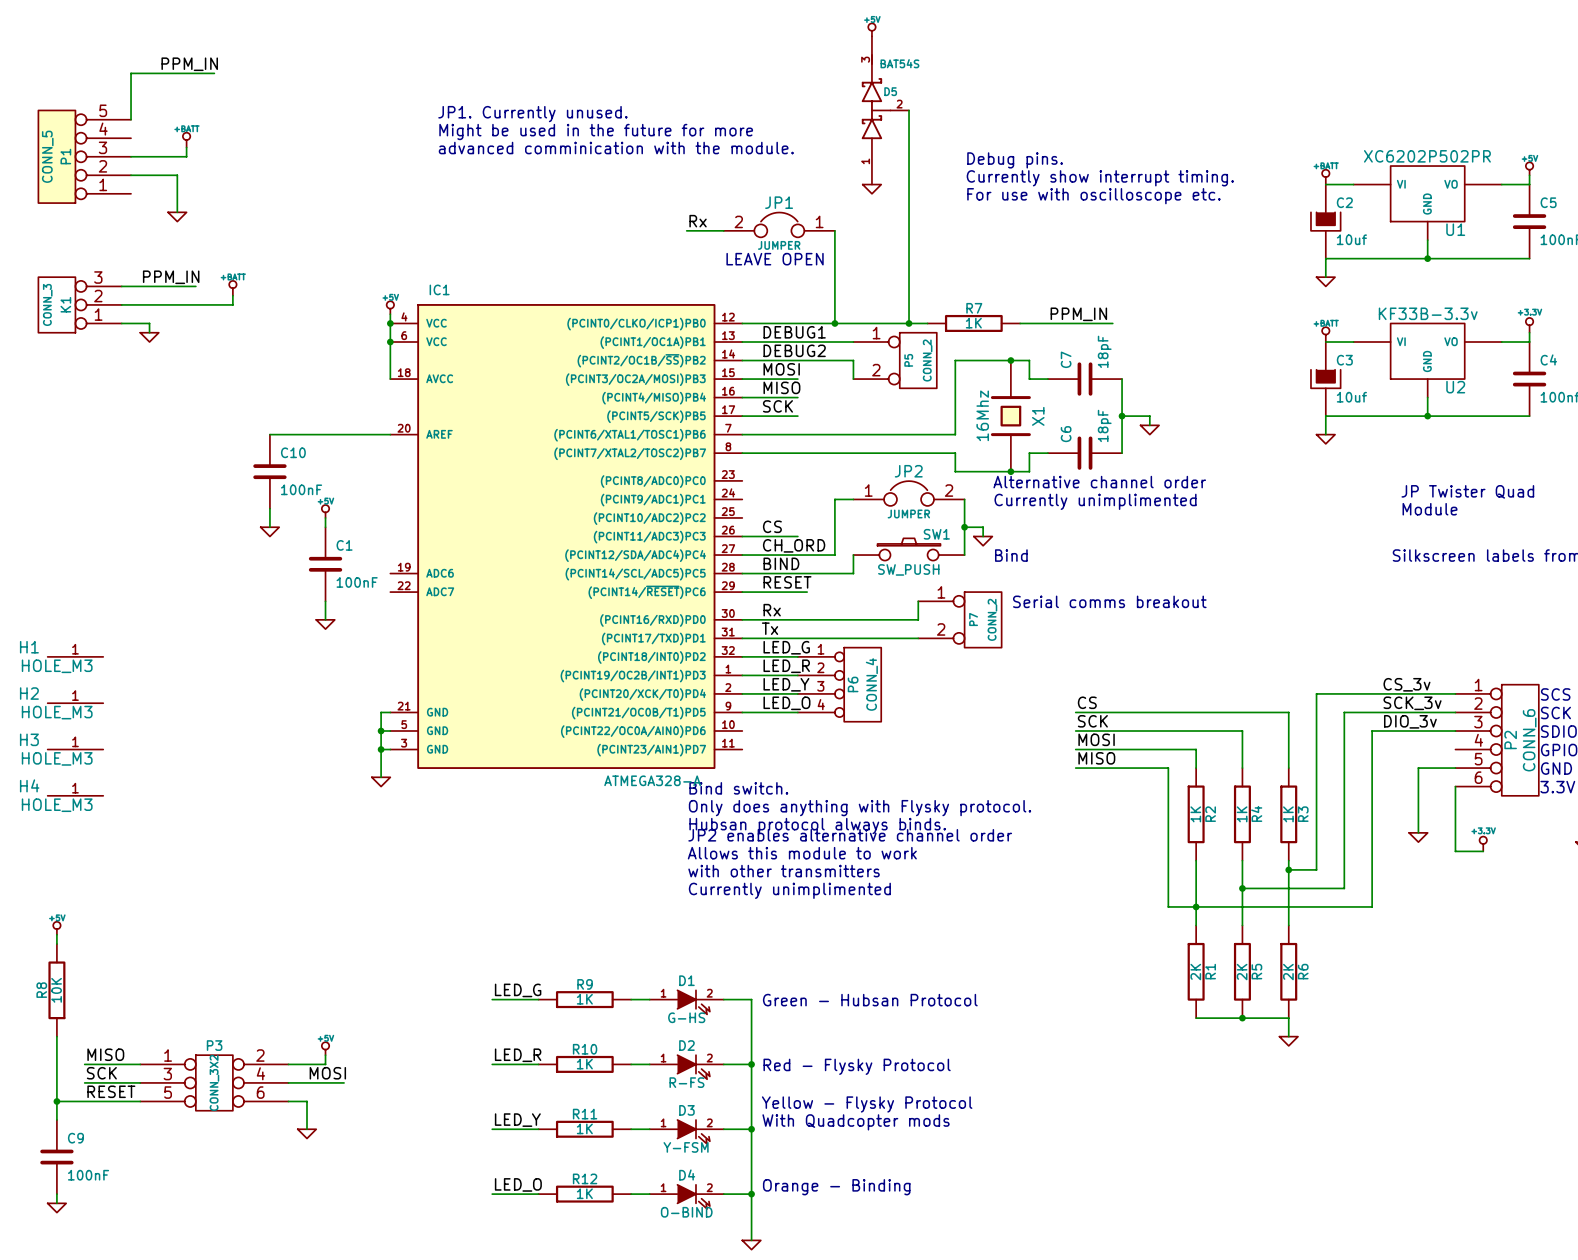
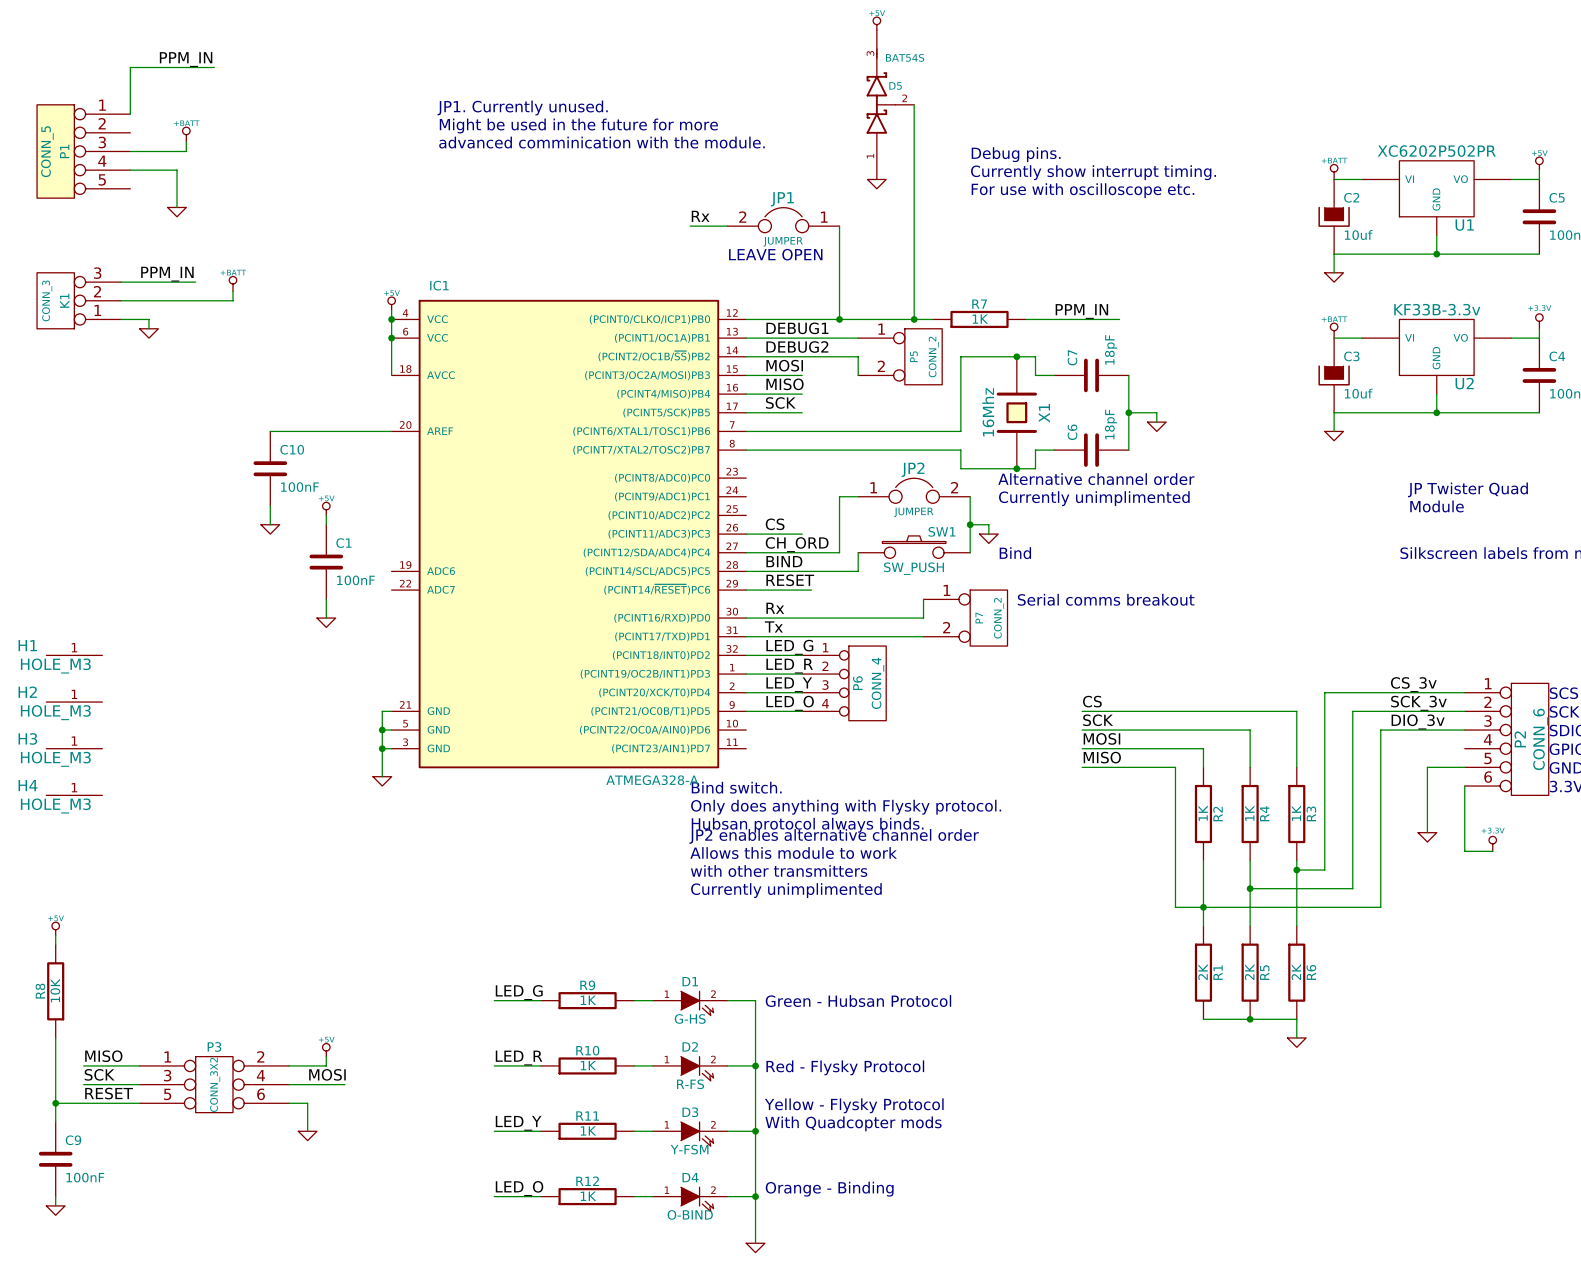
P1 flip: as is (56, 156) -> up-down (55, 151)

